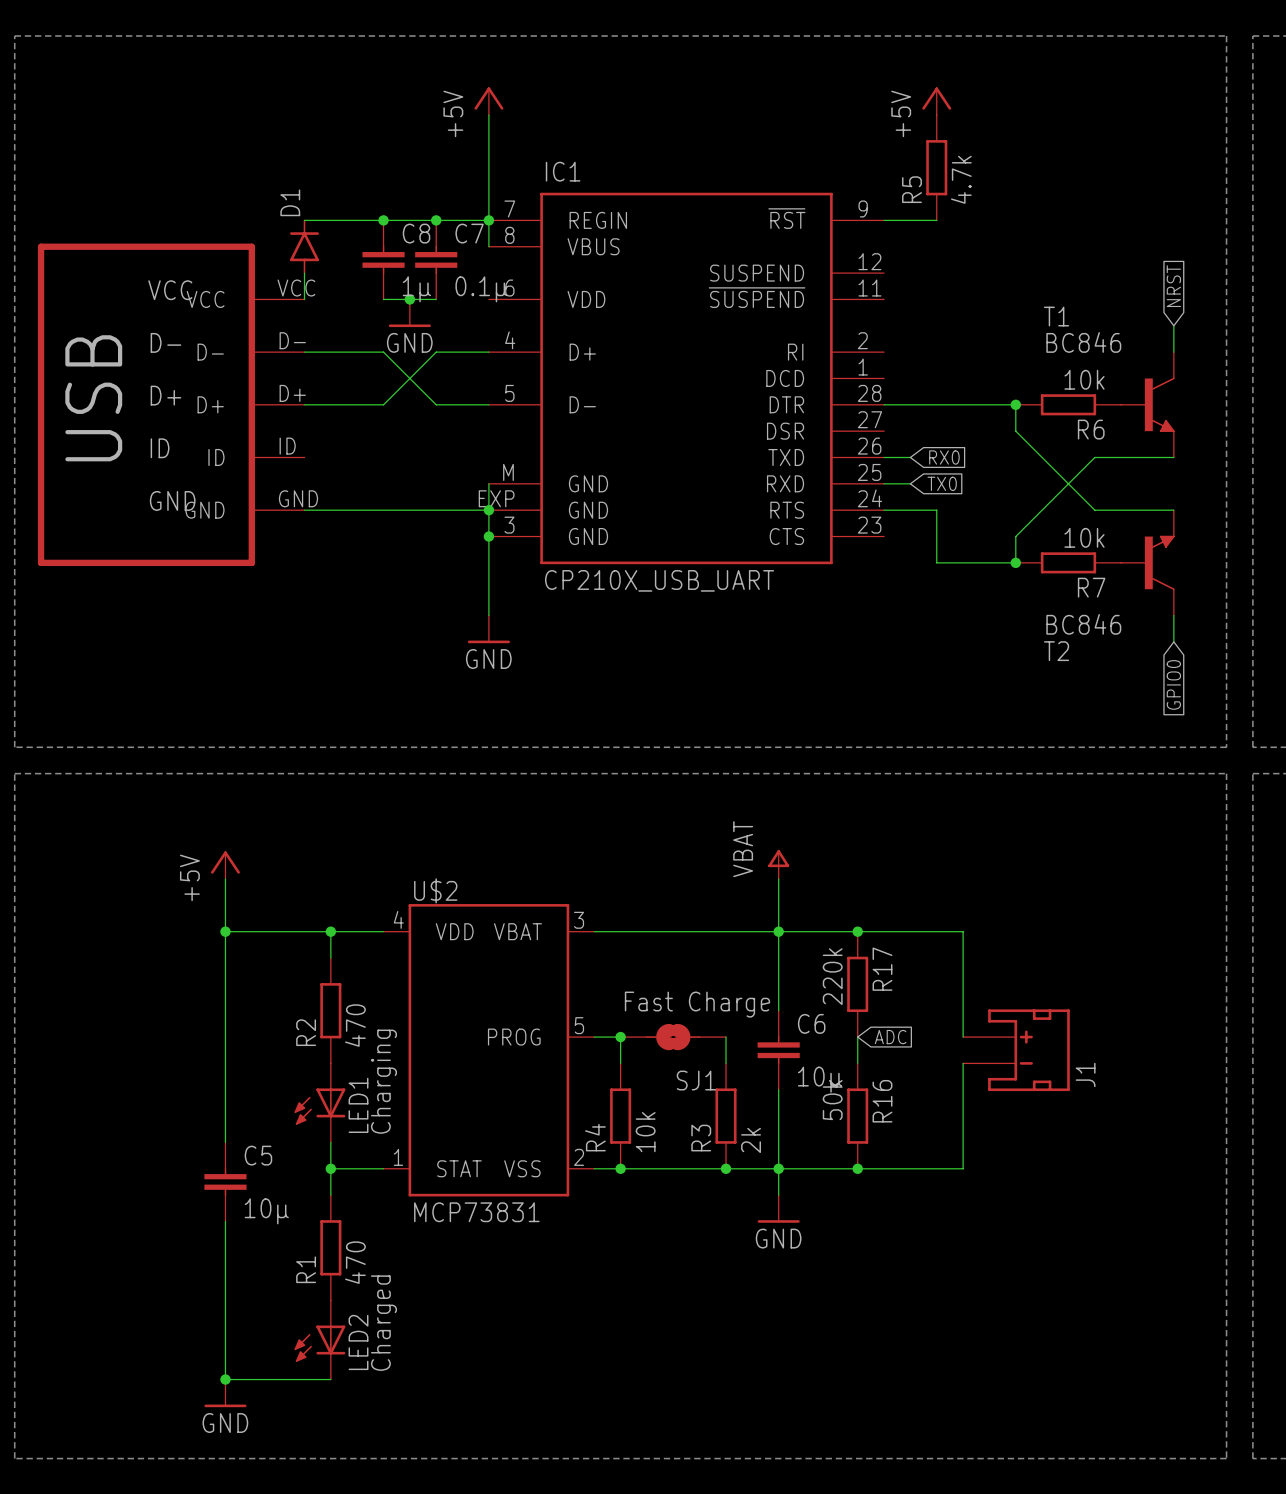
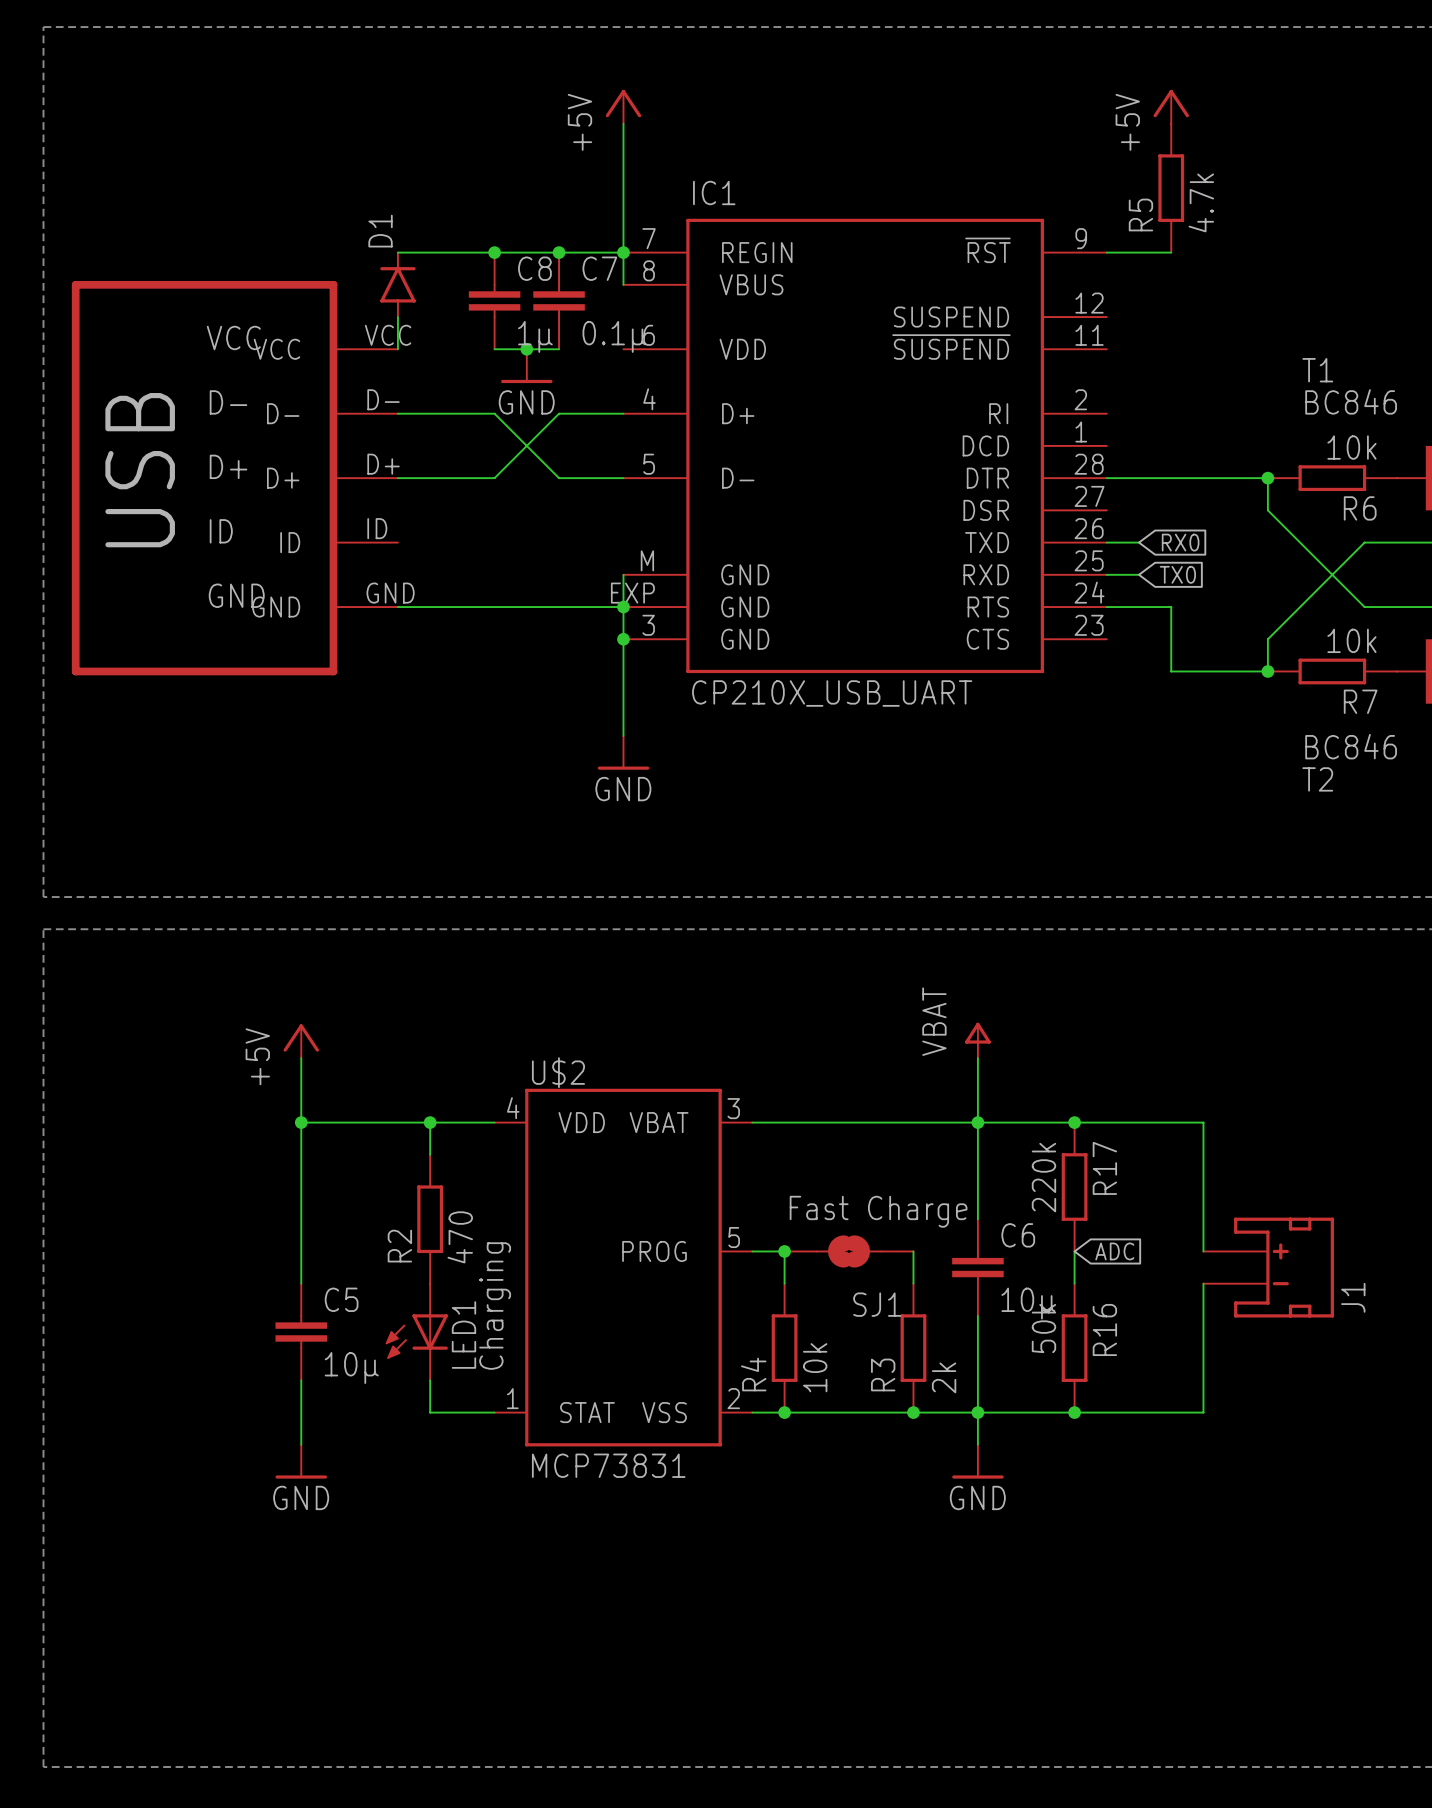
wire: (330, 1168) (330, 1195) -> none
junction: (330, 1168) -> none
C5 position: (225, 1181) -> (301, 1332)
wire: (225, 1221) (225, 1379) (330, 1379) -> none
R1: 470 (330, 1247) -> none
LED2: Charged (319, 1340) -> none
junction: (225, 1379) -> none
power symbol position: GND (225, 1393) -> GND (301, 1461)

